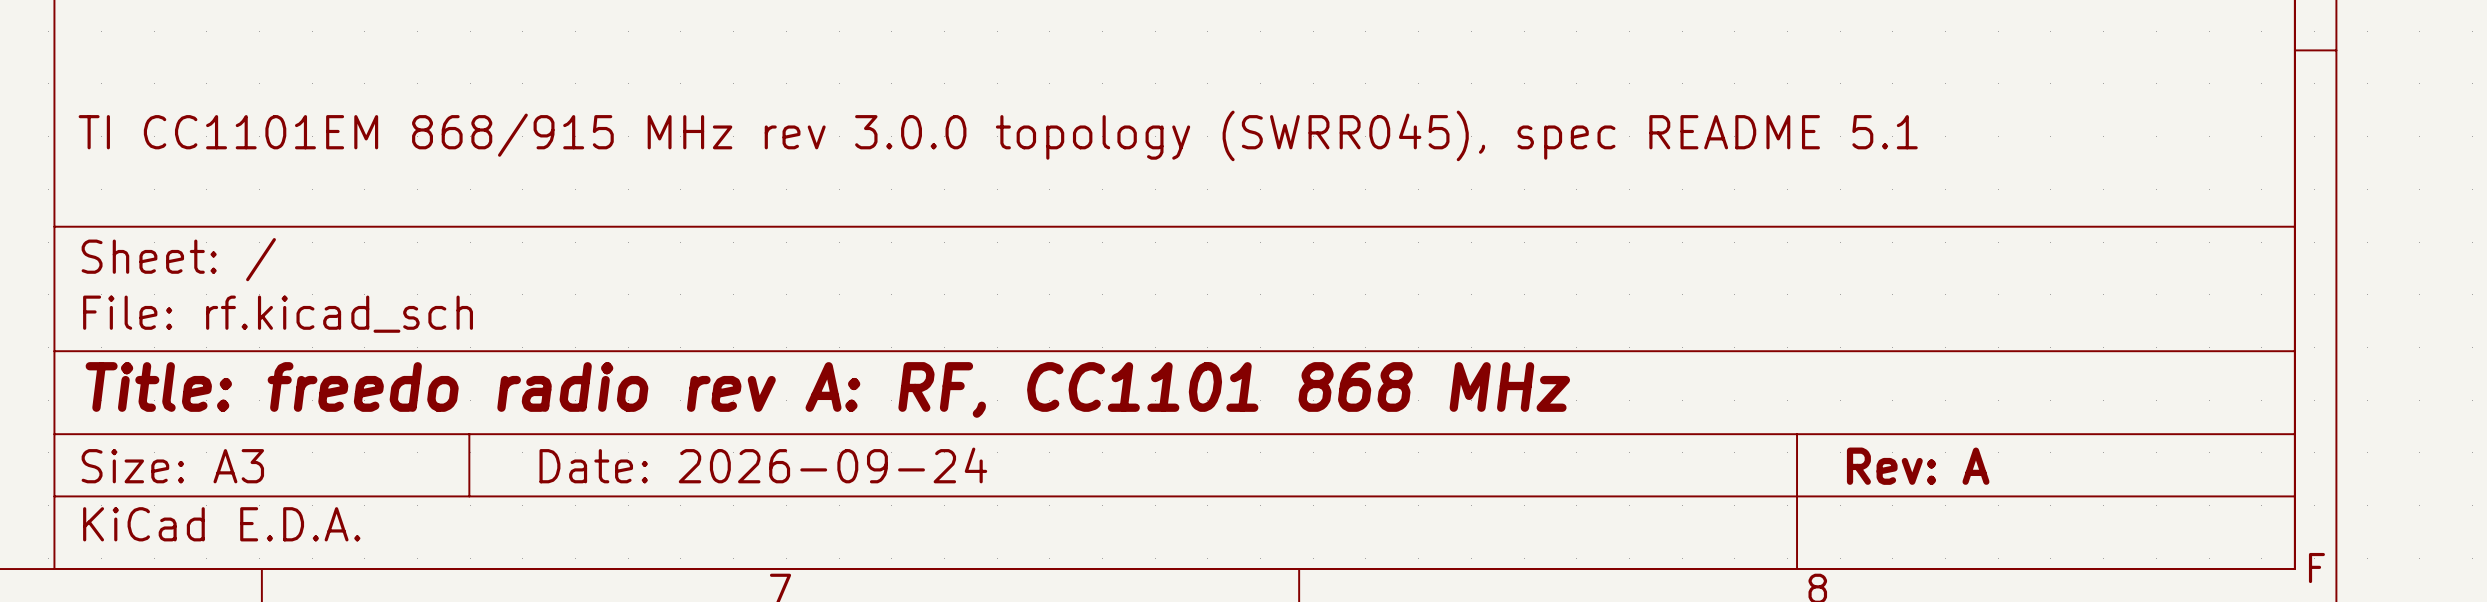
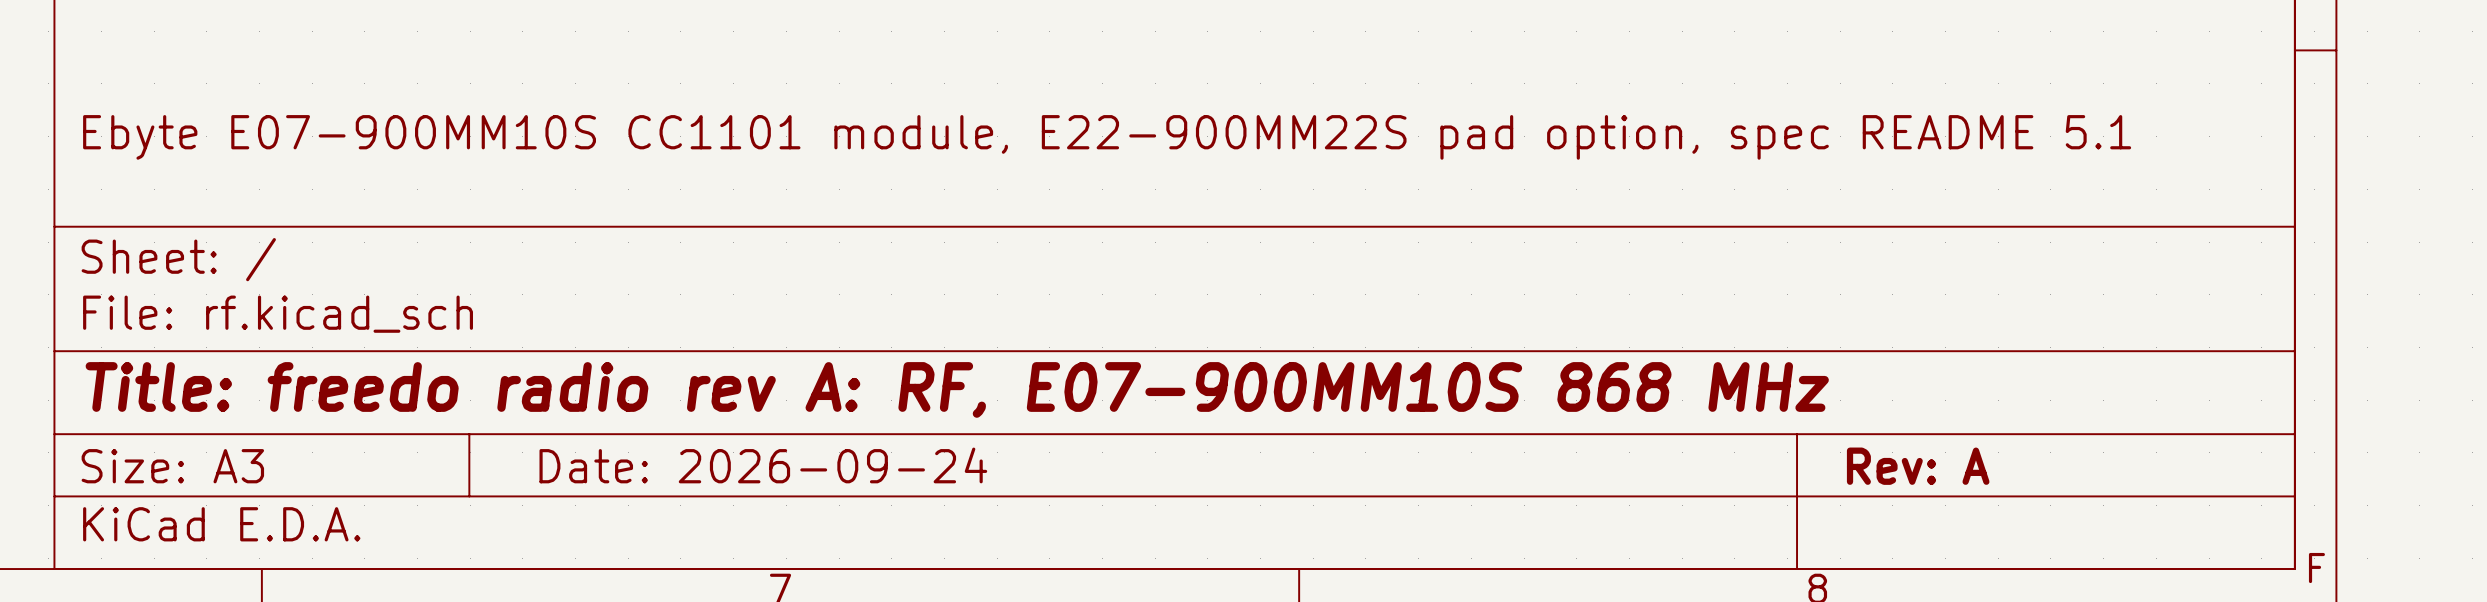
title block: TI CC1101EM 868/915 MHz rev 3.0.0 topology (SWRR045), spec README 5.1 (998, 135) -> Ebyte E07-900MM10S CC1101 module, E22-900MM22S pad option, spec README 5.1 (1107, 137)
title block: Title: freedo radio rev A: RF, CC1101 868 MHz (827, 389) -> Title: freedo radio rev A: RF, E07-900MM10S 868 MHz (957, 389)

